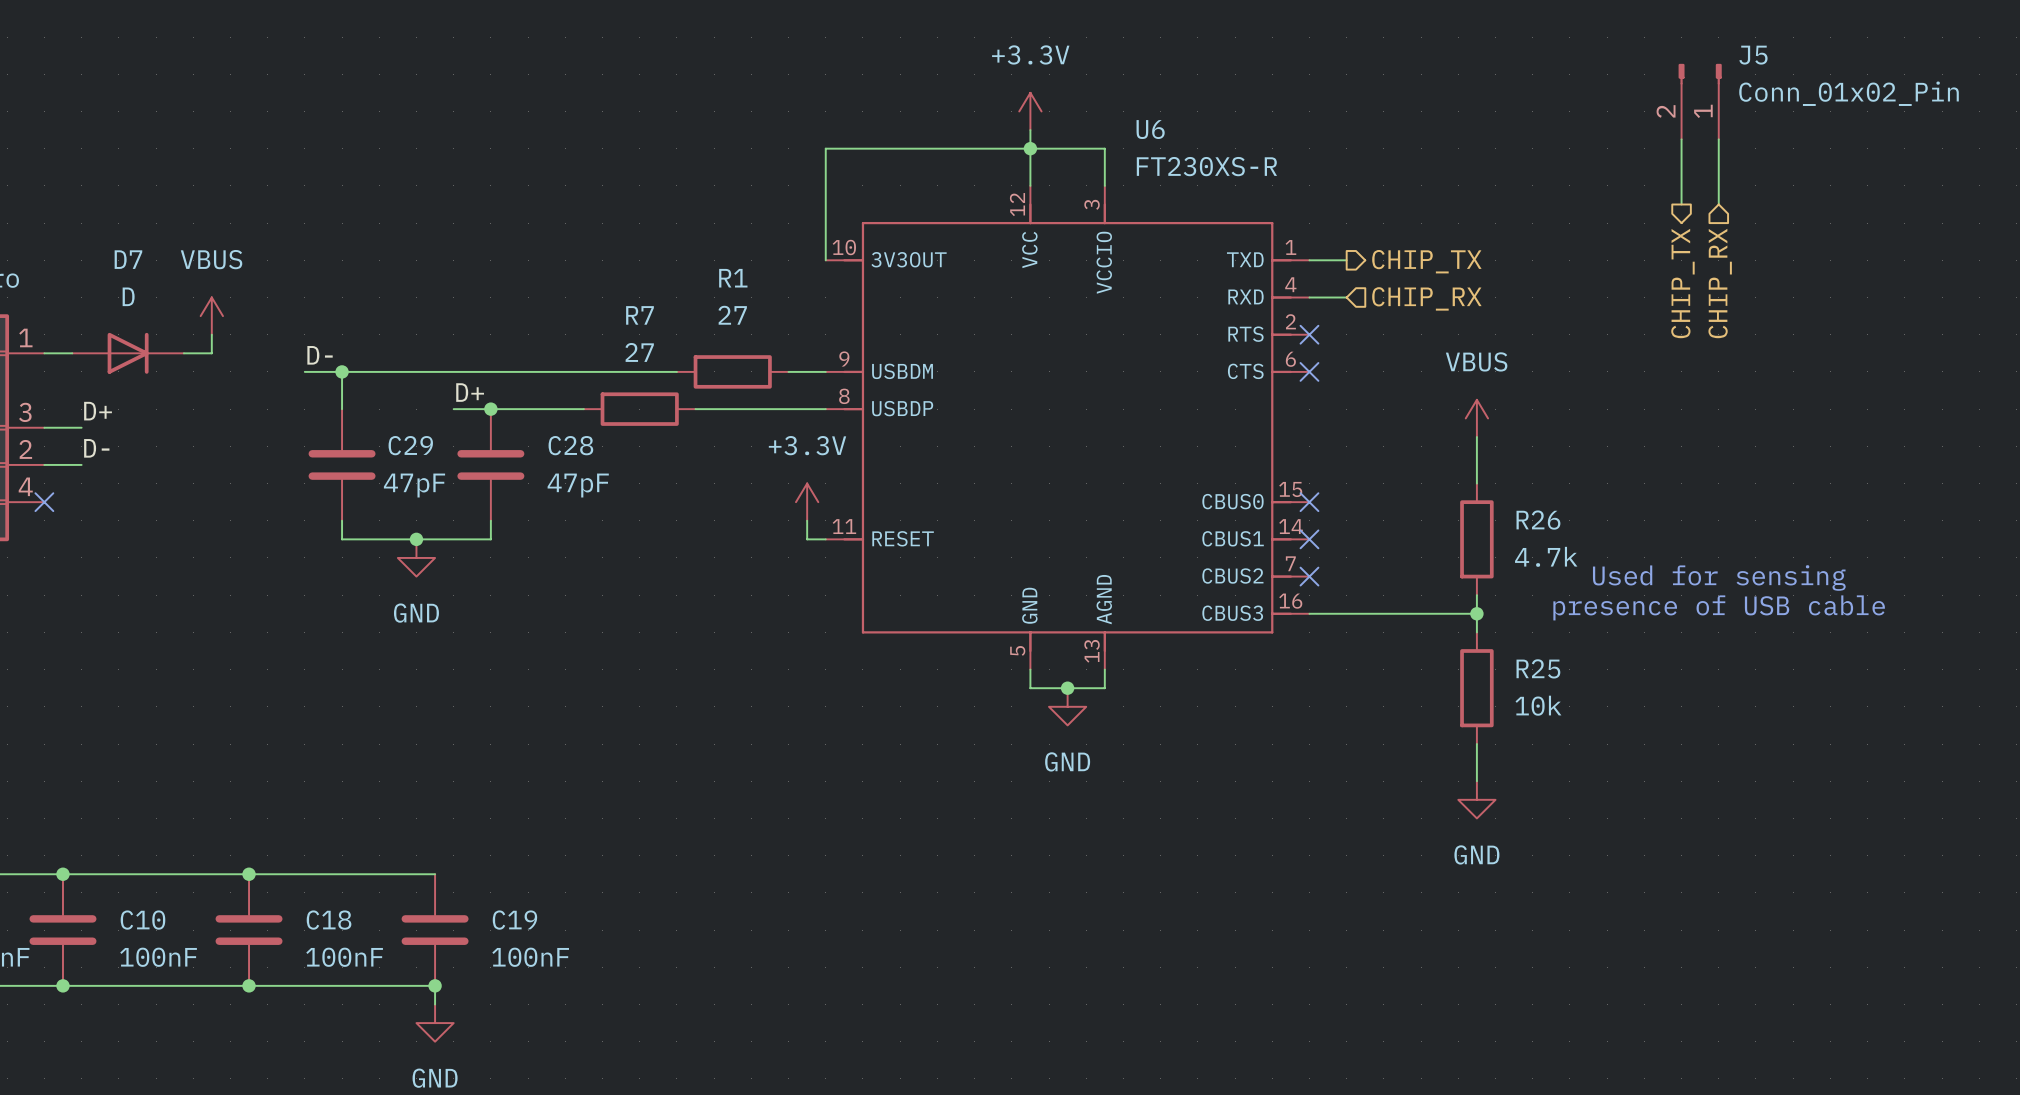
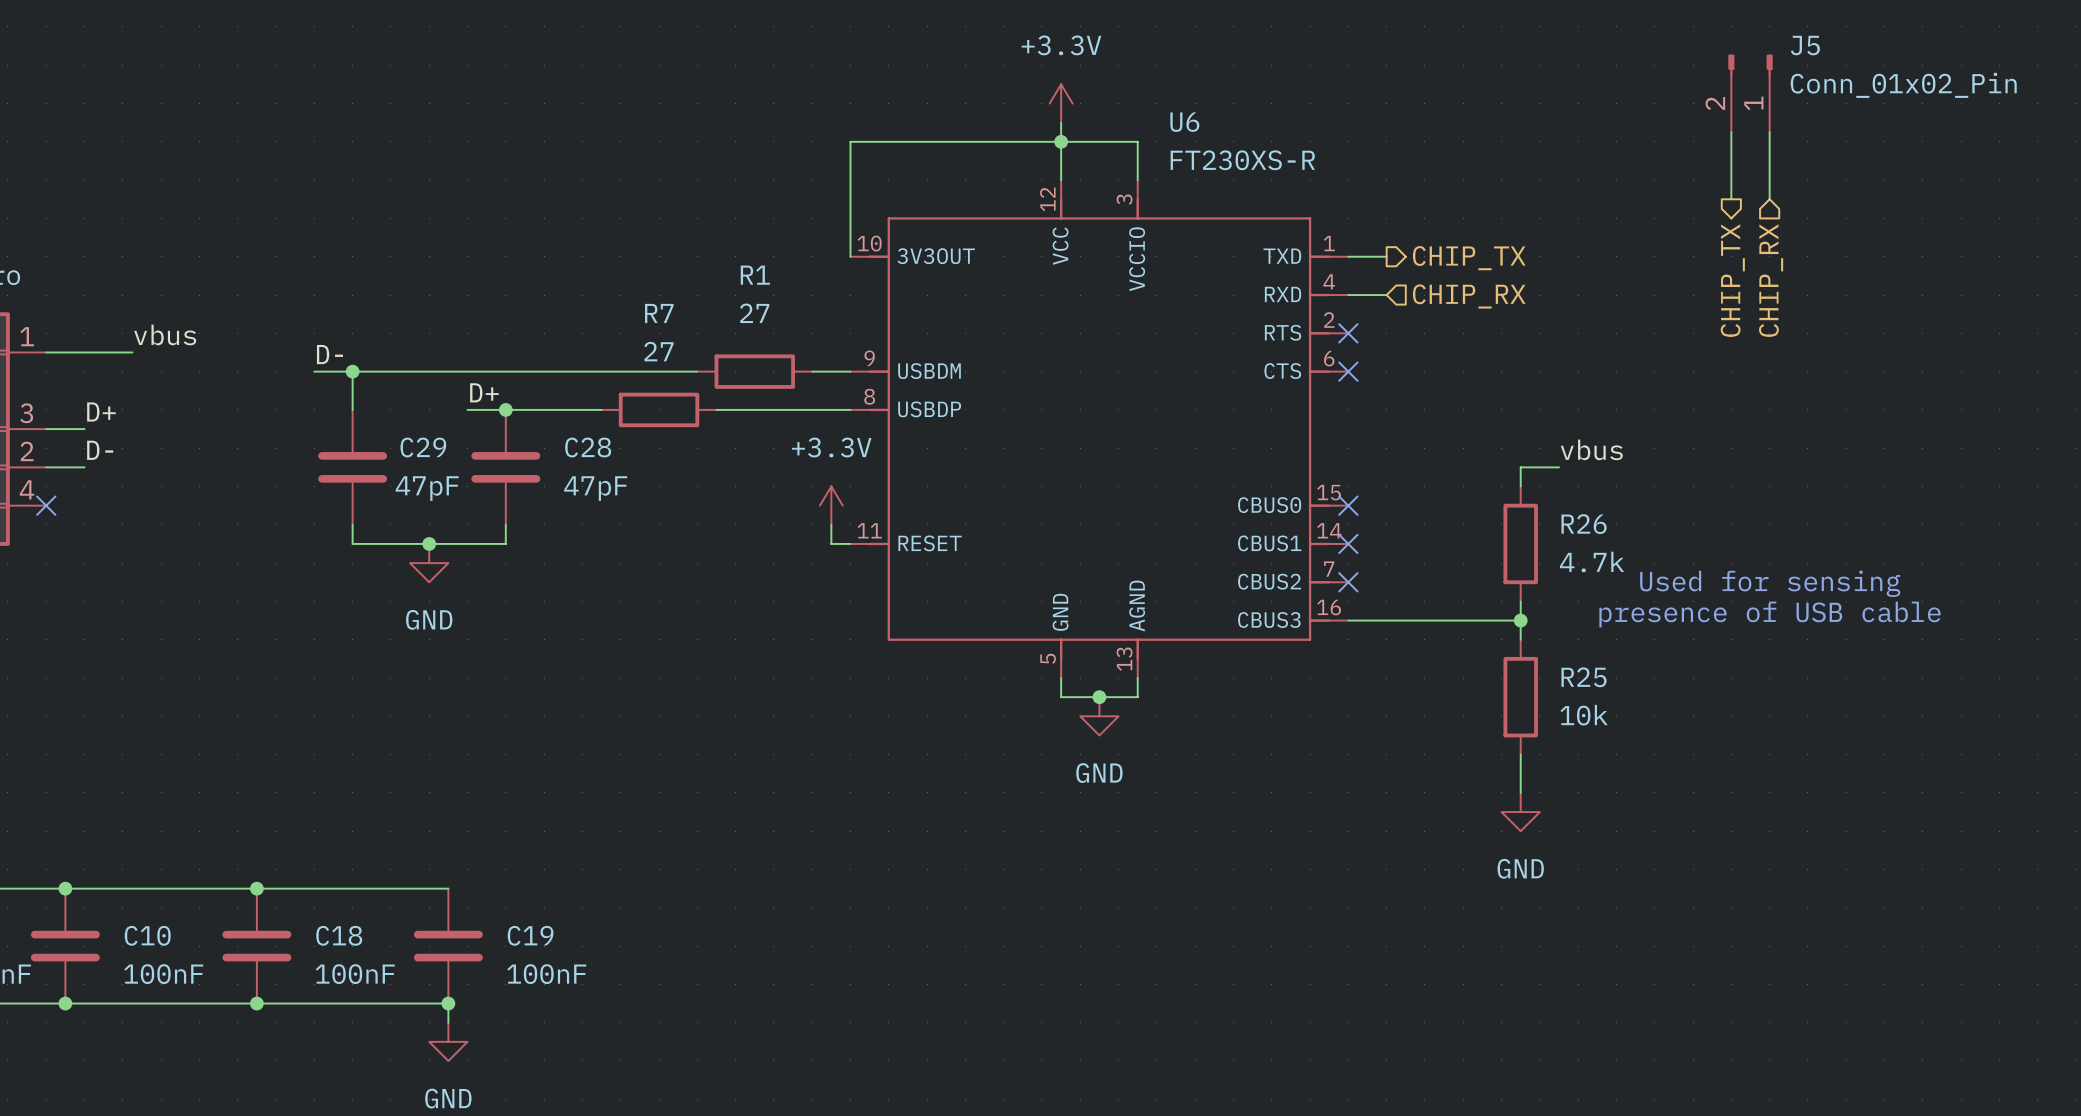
power symbol: VBUS (211, 316) -> none
wire: (211, 334) (211, 353) (183, 353) -> none
label: none -> vbus (165, 334)
D7: D (128, 353) -> none
power symbol: VBUS (1476, 418) -> none
wire: (1476, 437) (1476, 464) -> (1559, 467) (1520, 467)
label: none -> vbus (1591, 449)

